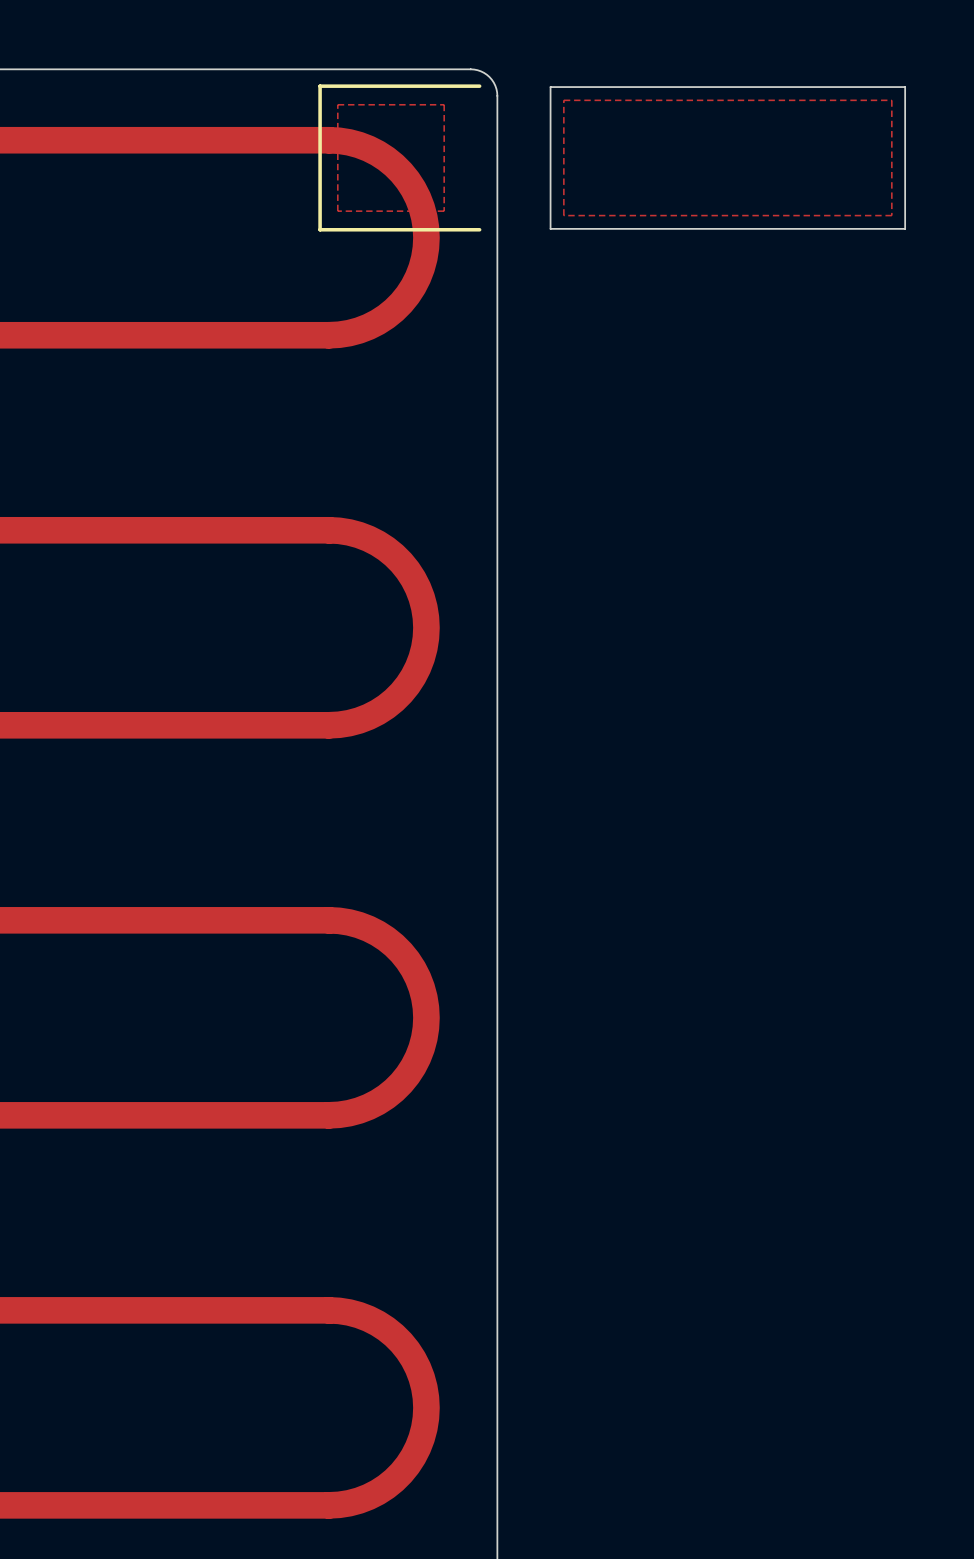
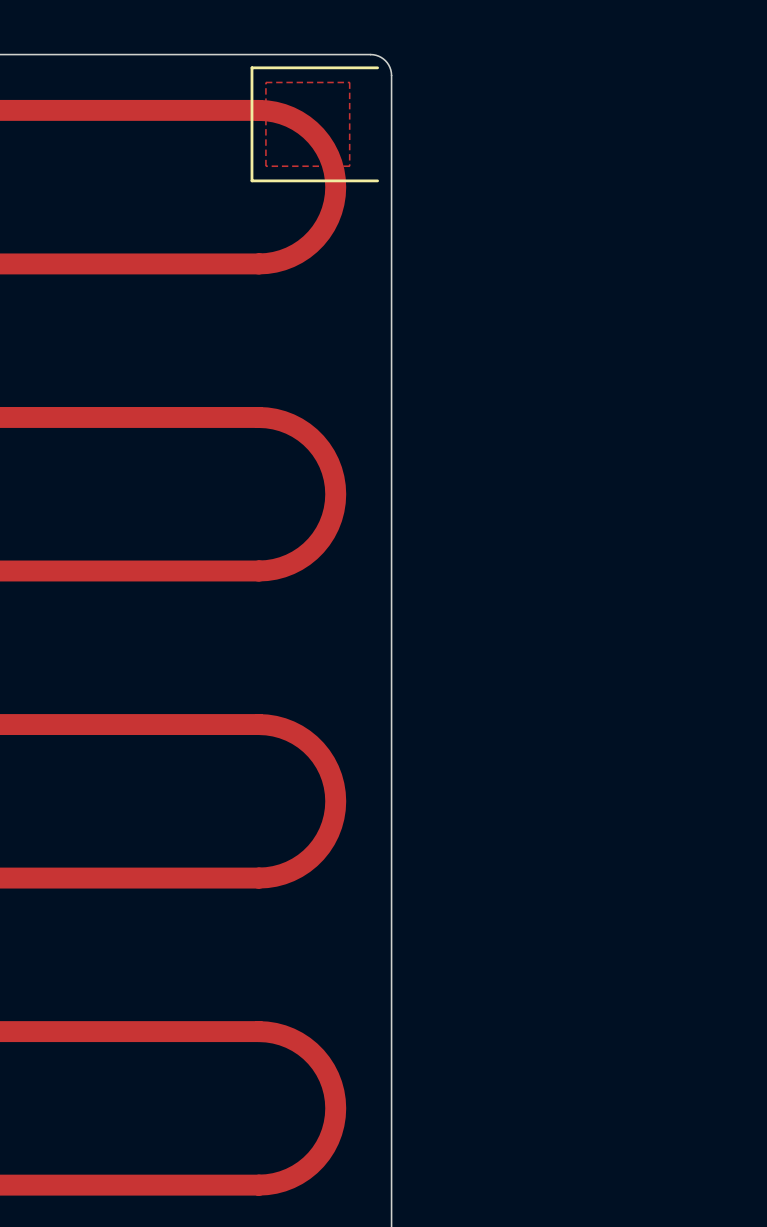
board edge: (550, 87) (905, 87) (905, 228) (550, 228) (550, 87) -> none
top zone outline: (563, 100) (563, 215) (891, 215) (891, 100) (563, 100) -> none

